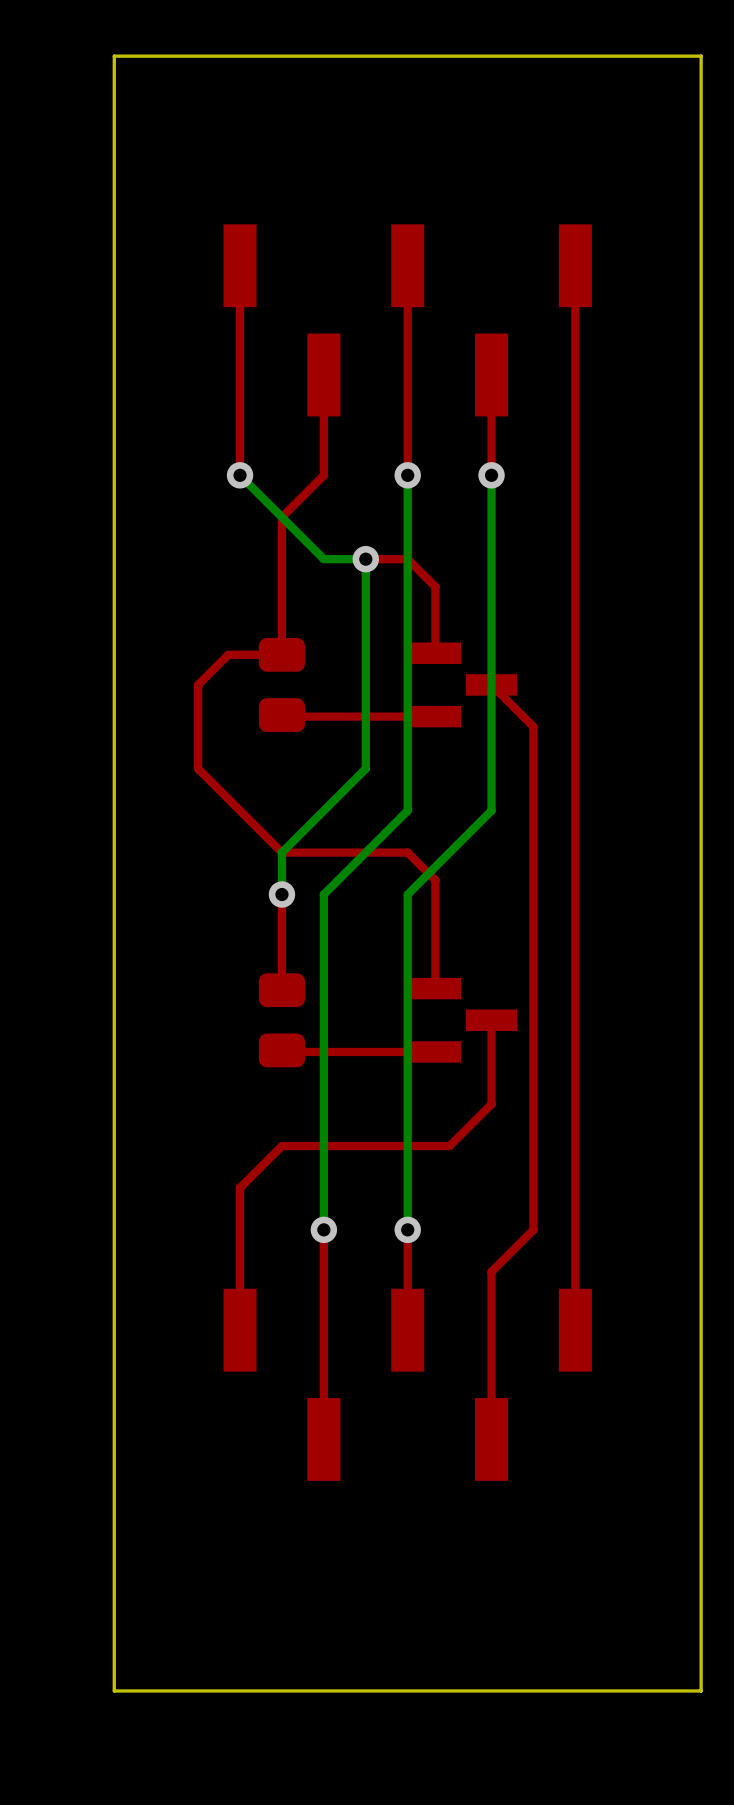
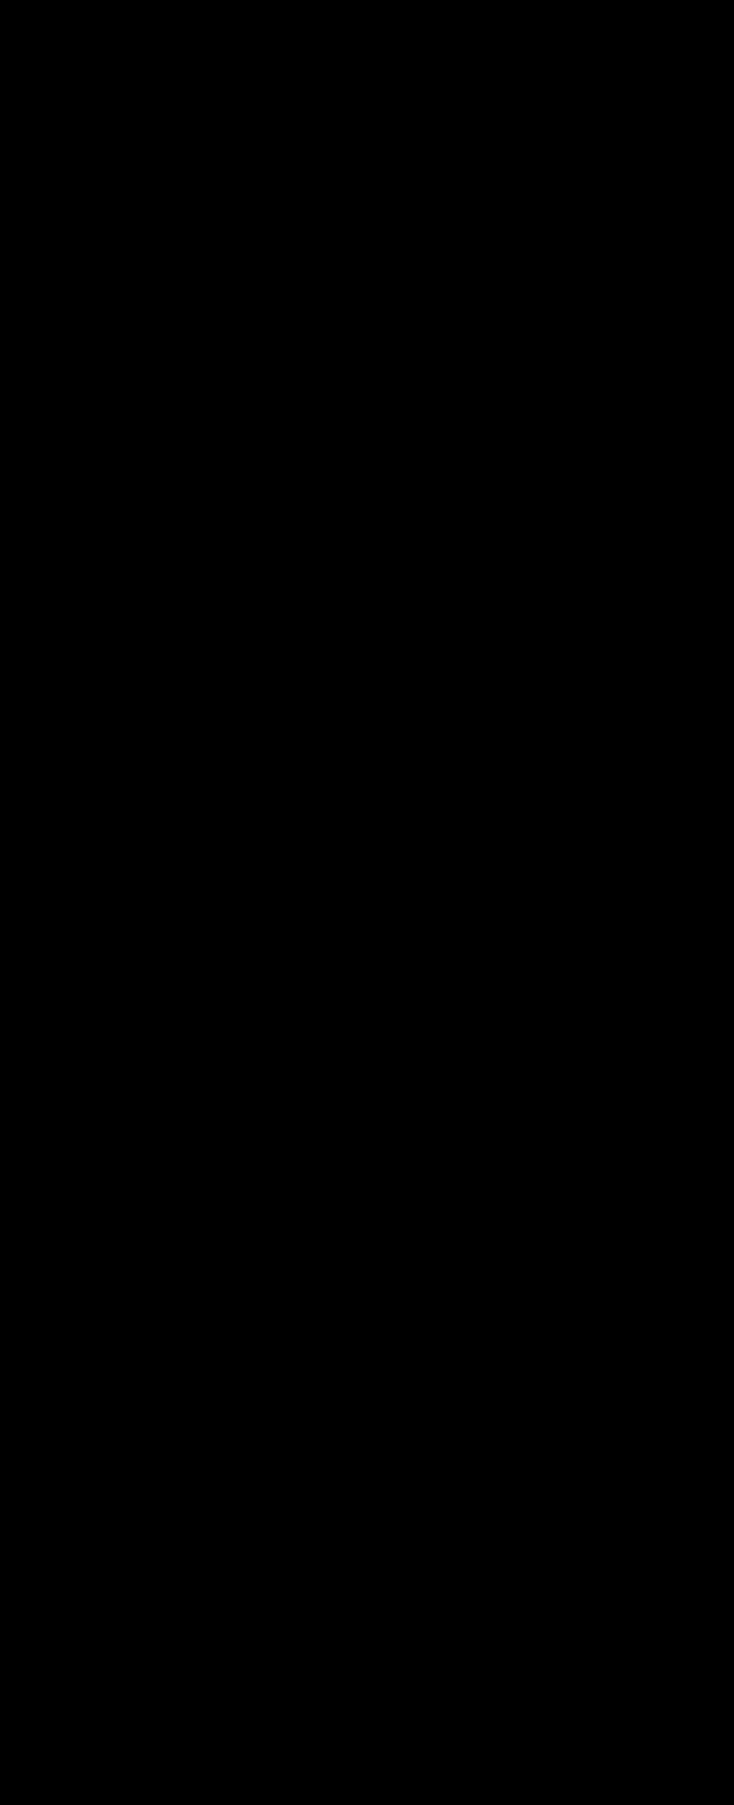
board edge: (701, 56) (114, 56) (114, 1690) (701, 1690) (701, 56) -> none
top track: (240, 265) (240, 475) -> none
top track: (407, 265) (407, 475) -> none
top track: (575, 265) (575, 1330) -> none
part: (407, 320) -> none
top track: (323, 374) (323, 475) (281, 517) (281, 654) (228, 654) (198, 684) (198, 768) (281, 852) (407, 852) (435, 880) (435, 988) -> none
top track: (491, 374) (491, 475) -> none
bottom track: (240, 475) (323, 559) (365, 559) (365, 768) (281, 852) (281, 894) -> none
via: (240, 475) -> none
bottom track: (407, 475) (407, 810) (323, 894) (323, 1229) -> none
via: (407, 475) -> none
bottom track: (491, 475) (491, 810) (407, 894) (407, 1229) -> none
via: (491, 475) -> none
top track: (365, 559) (407, 559) (435, 586) (435, 653) -> none
via: (365, 559) -> none
part: (281, 684) -> none
part: (463, 684) -> none
top track: (491, 684) (533, 726) (533, 1229) (491, 1271) (491, 1439) -> none
top track: (281, 715) (283, 716) (435, 716) -> none
top track: (281, 894) (281, 990) -> none
via: (281, 894) -> none
part: (281, 1020) -> none
part: (463, 1020) -> none
top track: (491, 1020) (491, 1104) (449, 1146) (281, 1146) (240, 1187) (240, 1330) -> none
top track: (281, 1050) (283, 1051) (435, 1051) -> none
top track: (323, 1229) (323, 1439) -> none
via: (323, 1229) -> none
top track: (407, 1229) (407, 1330) -> none
via: (407, 1229) -> none
part: (407, 1384) -> none

